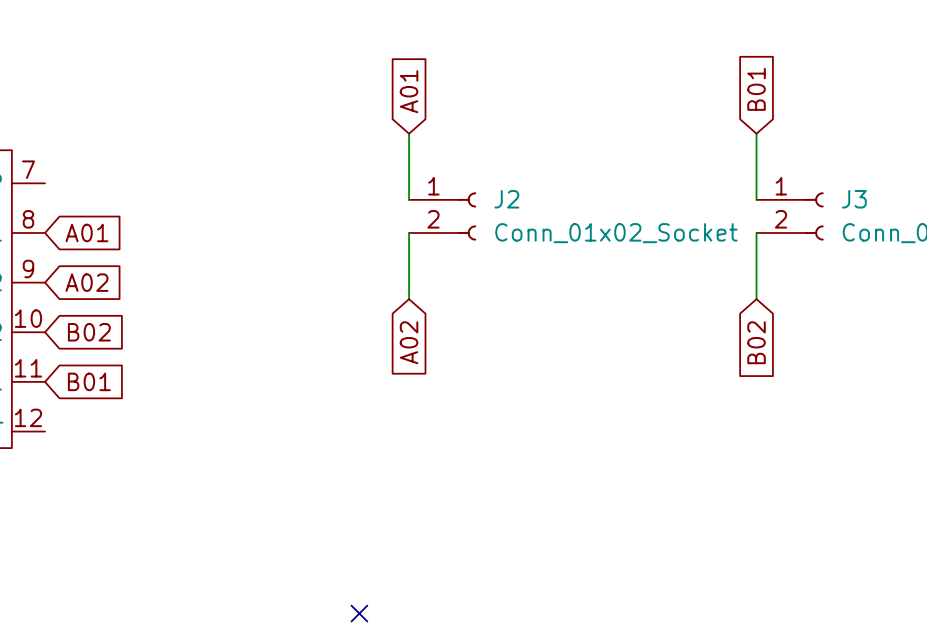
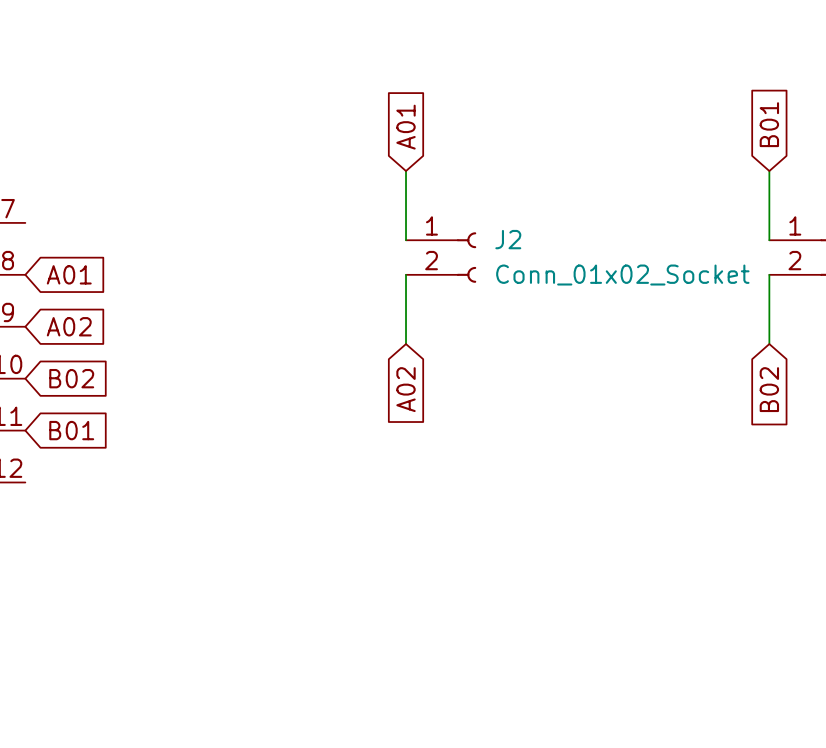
no-connect mark: (359, 613) -> none

